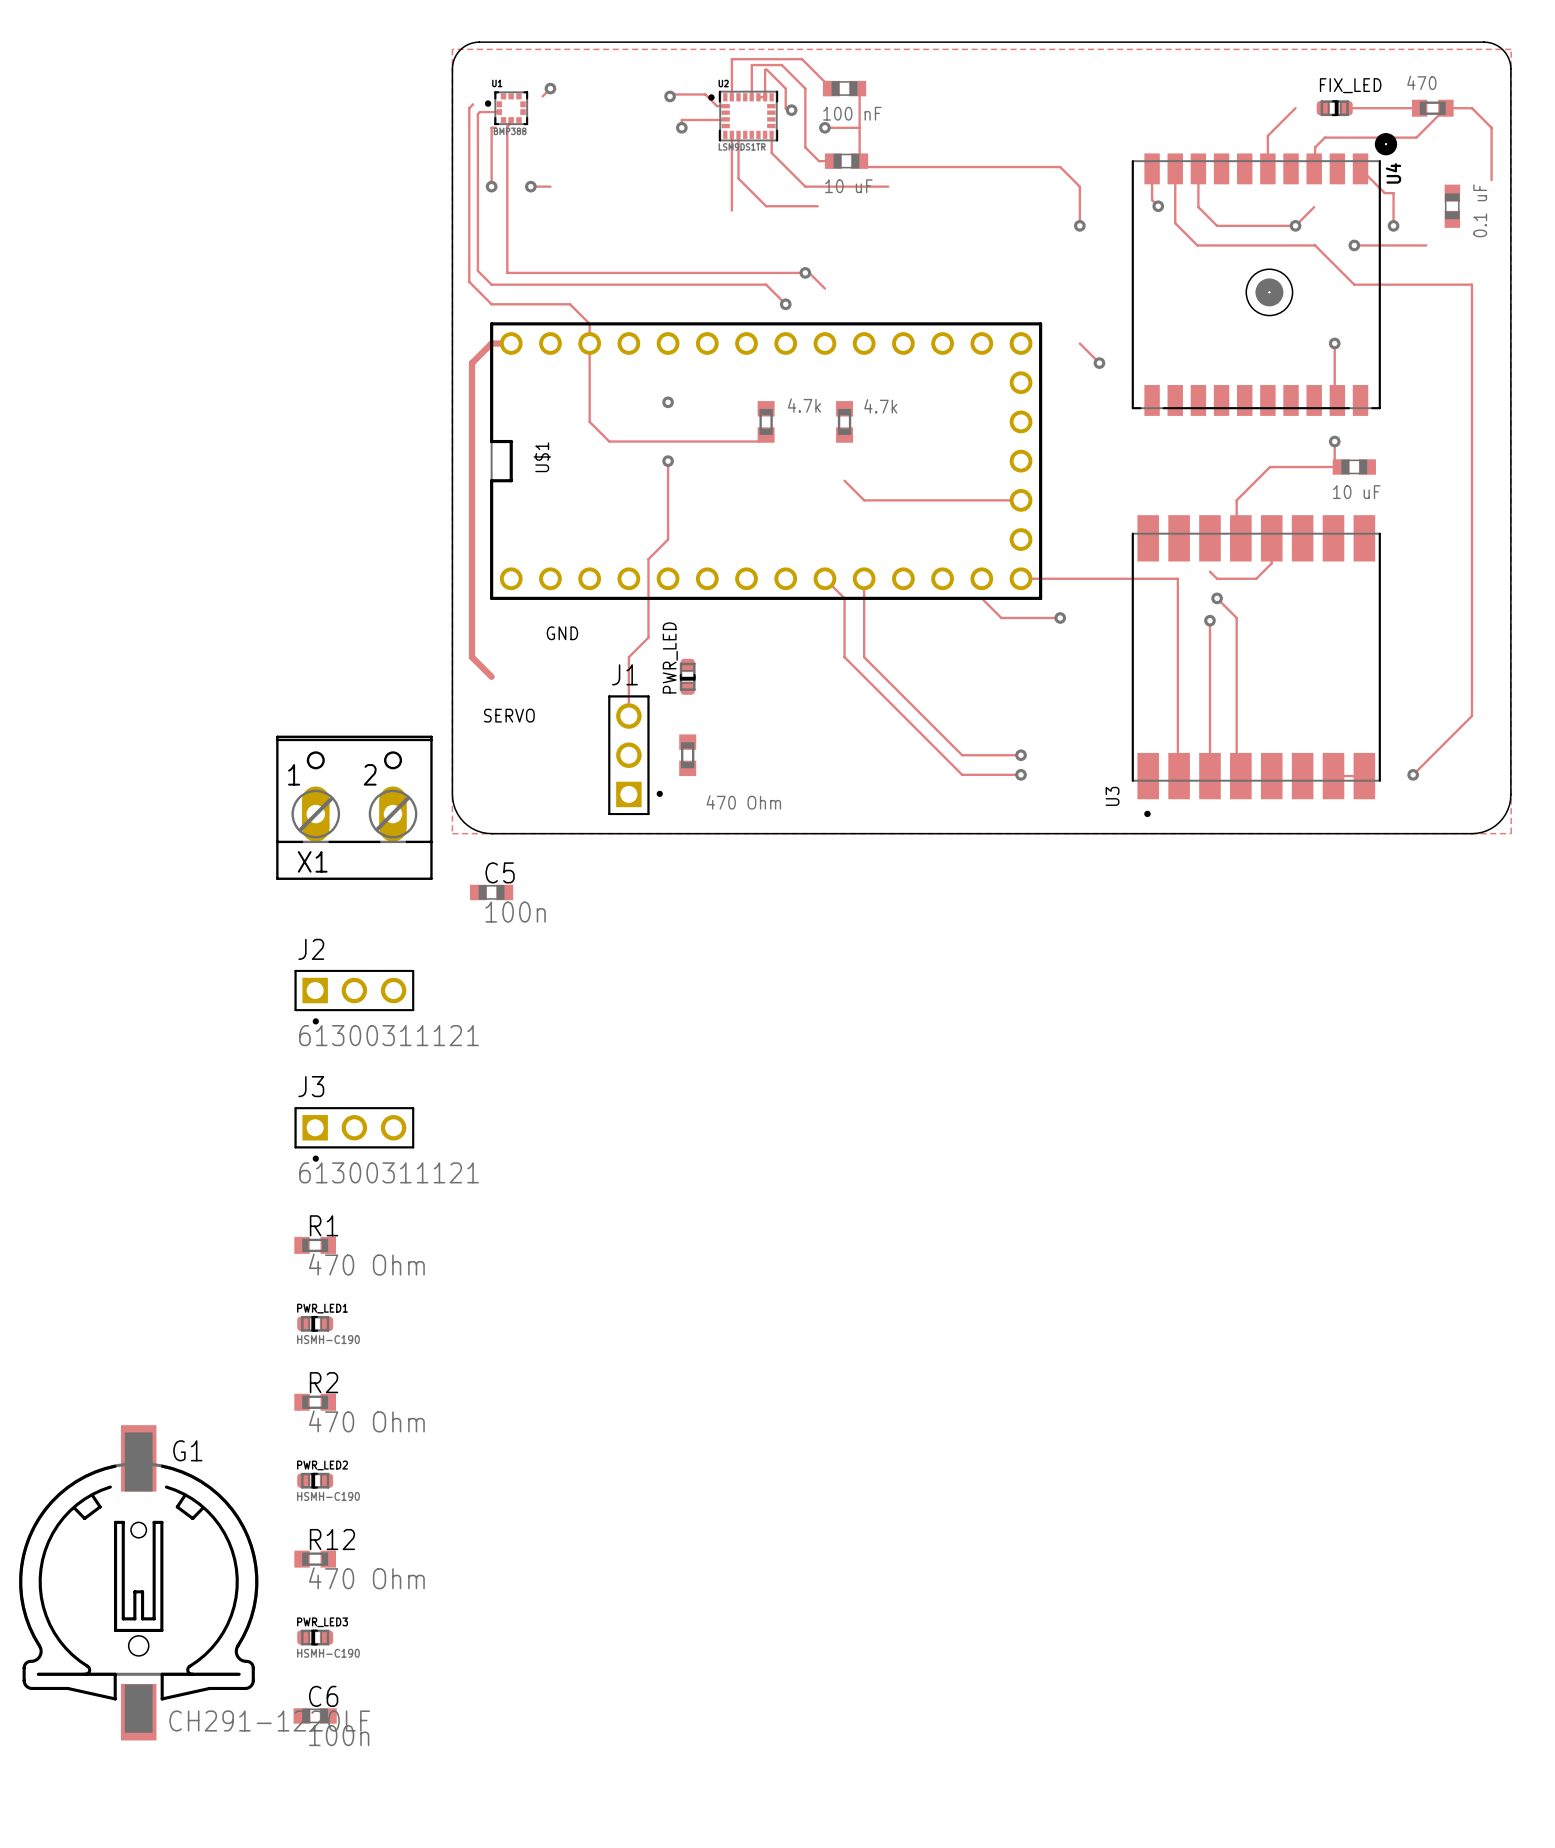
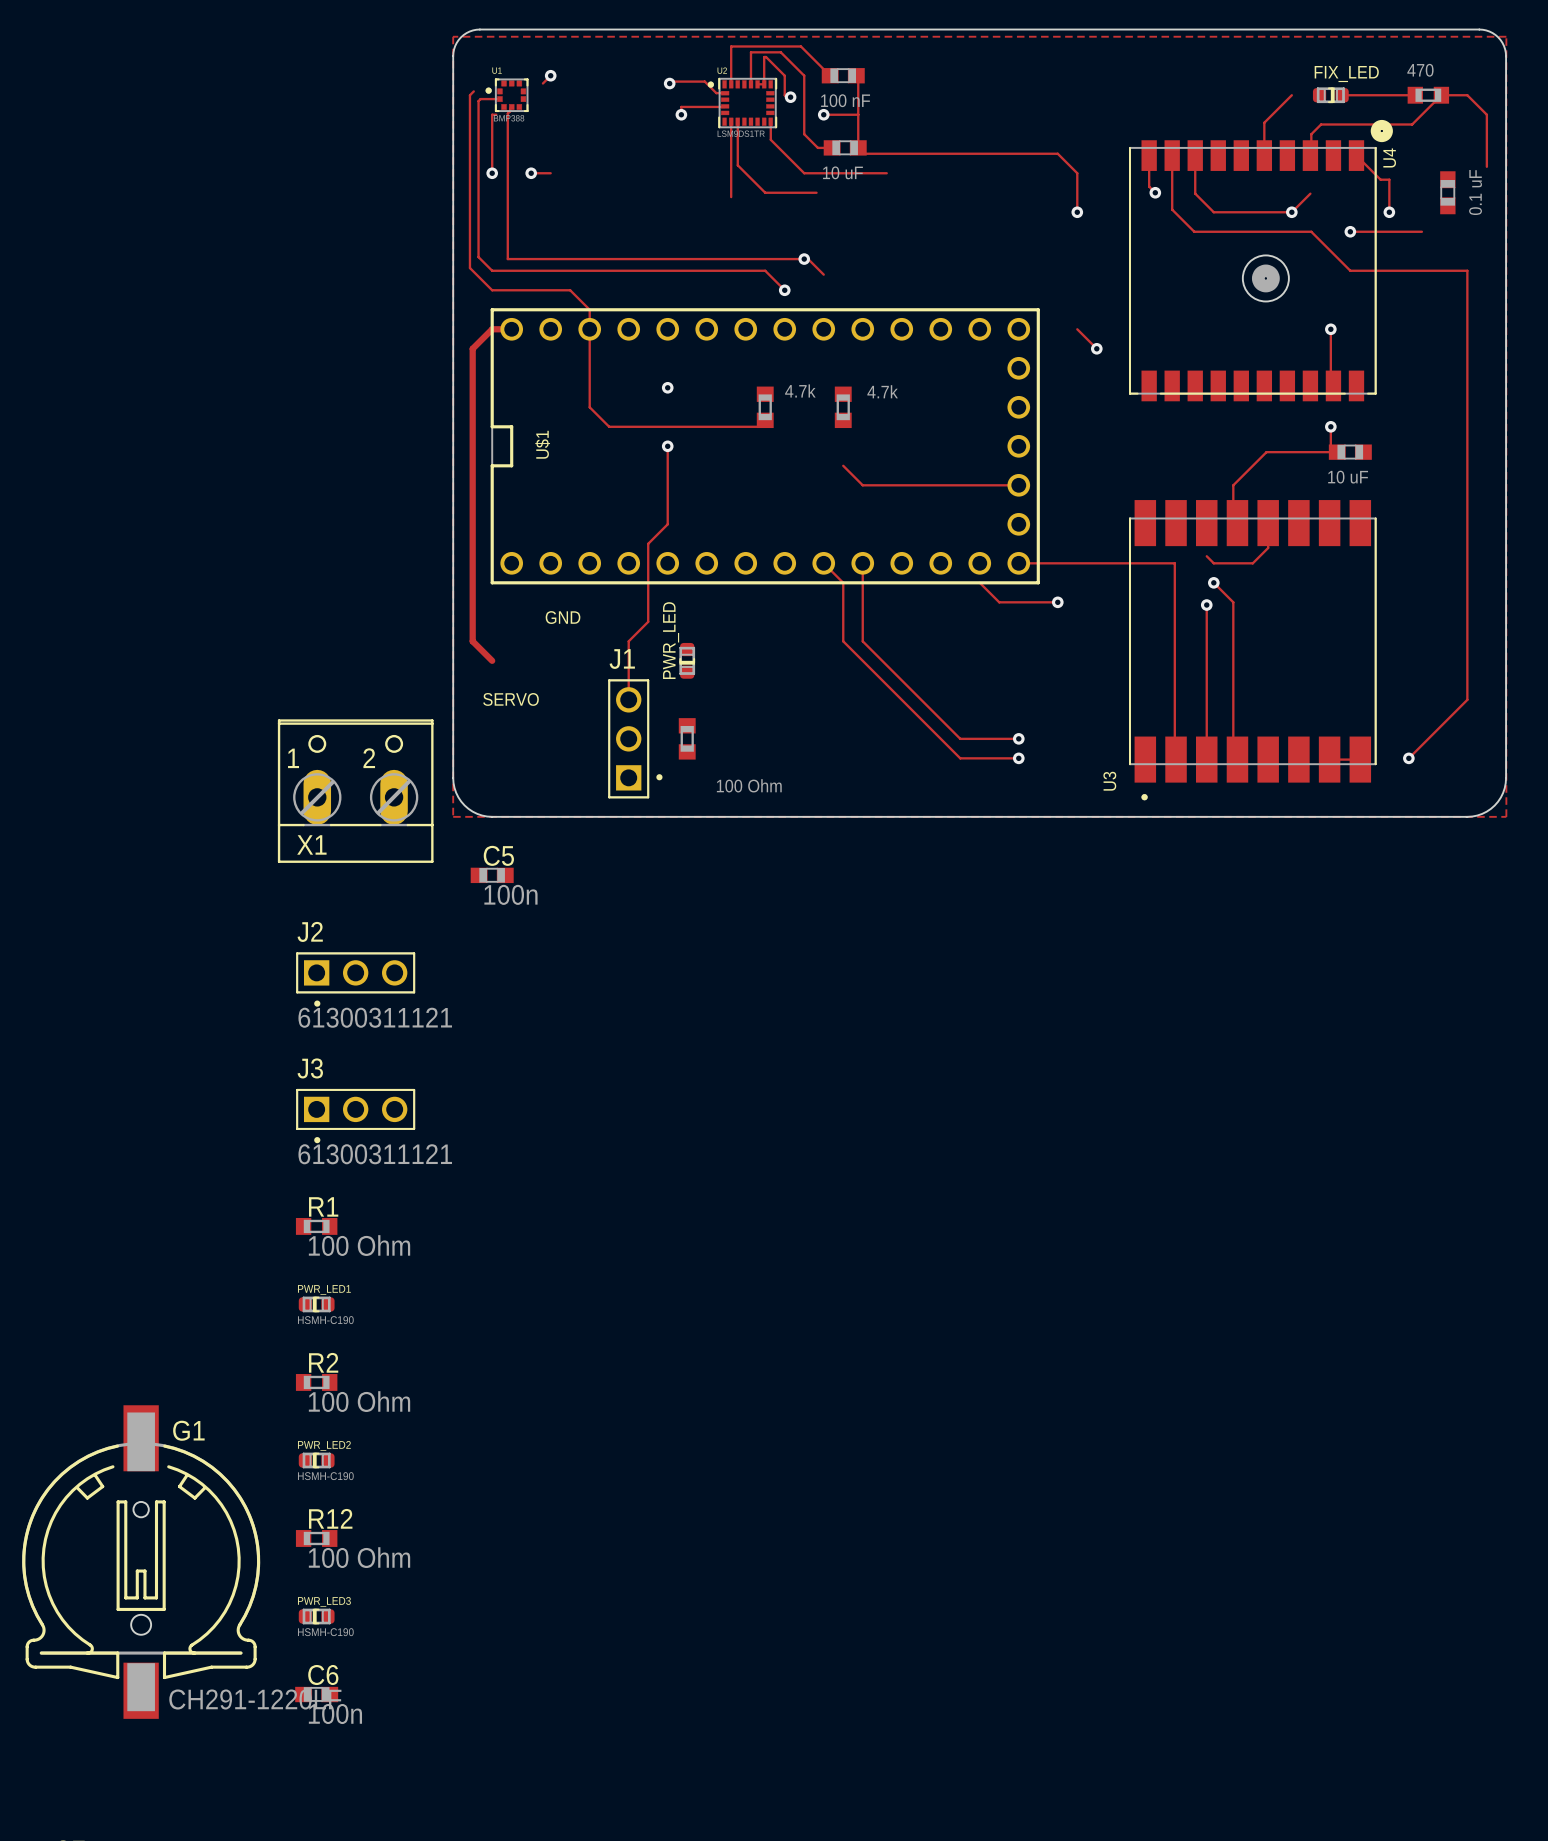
part value: 470 Ohm (743, 802) -> 100 Ohm (749, 785)
R1 value: 470 Ohm (366, 1264) -> 100 Ohm (359, 1245)
R2 value: 470 Ohm (366, 1421) -> 100 Ohm (359, 1401)
R12 value: 470 Ohm (366, 1578) -> 100 Ohm (359, 1557)

